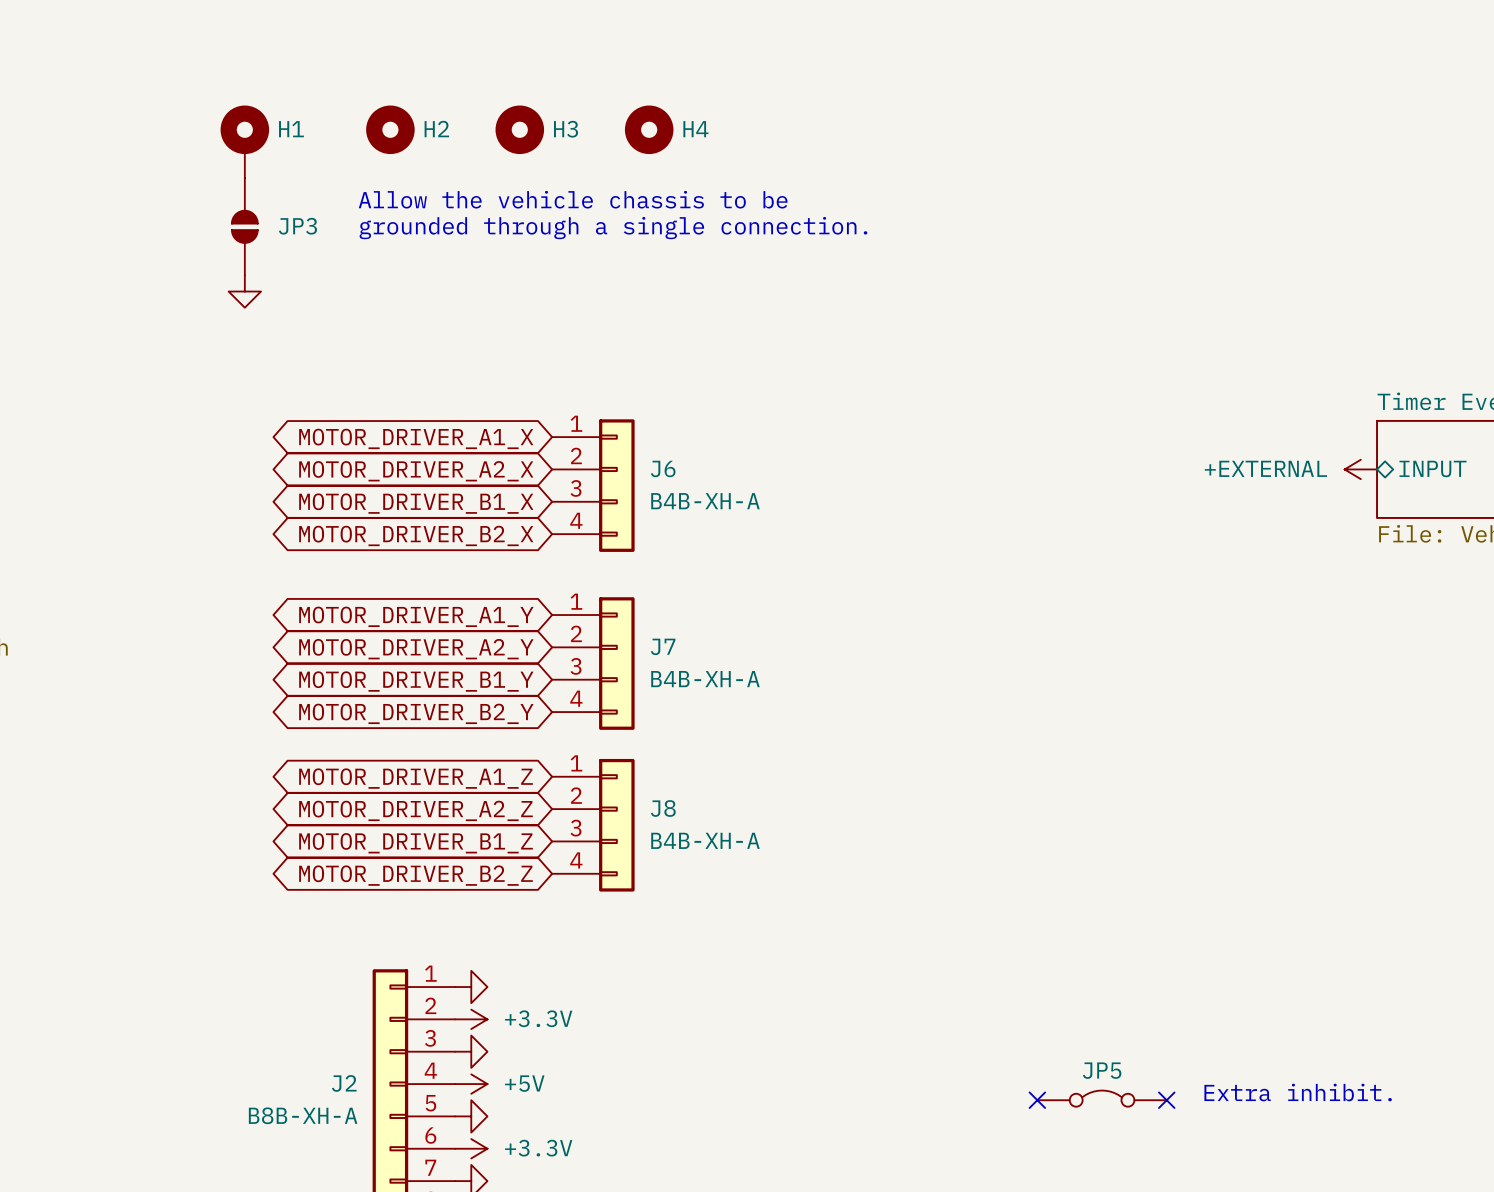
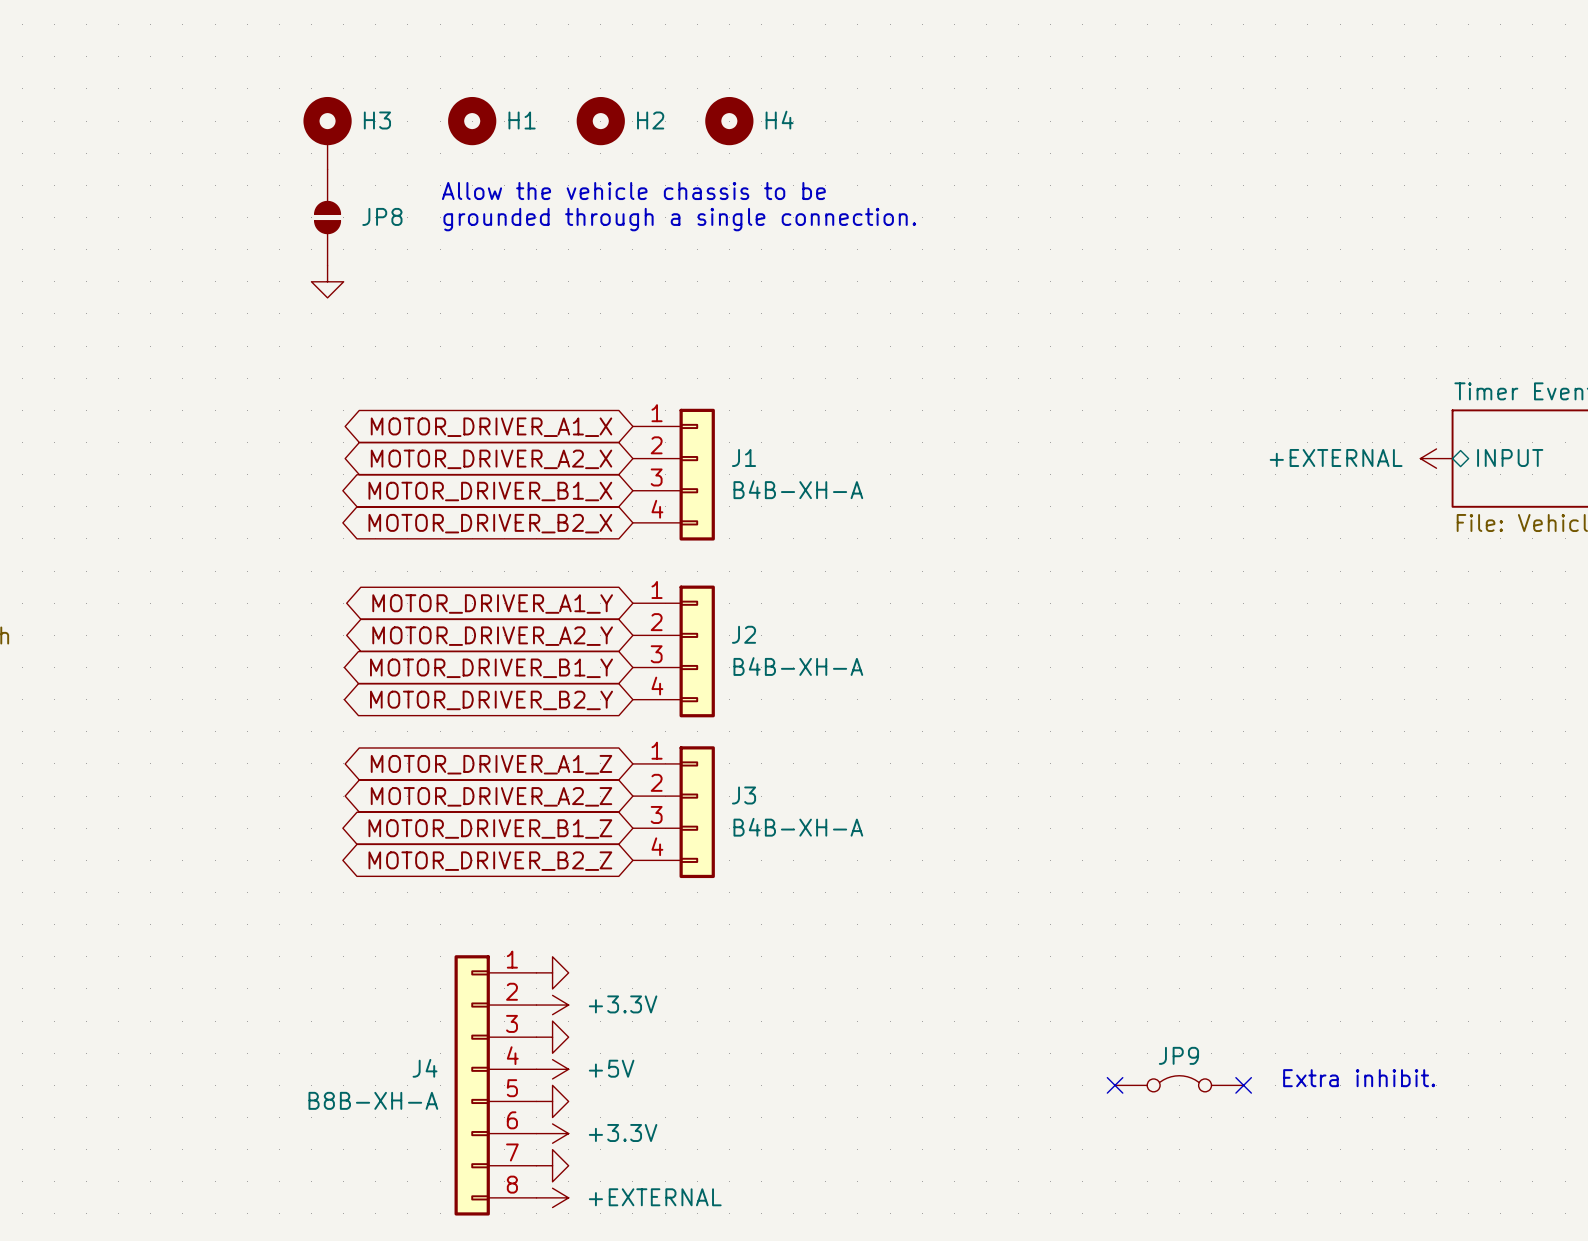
H1 name: H1 (291, 129) -> H3 (377, 120)
H2 name: H2 (436, 129) -> H1 (522, 120)
H3 name: H3 (566, 129) -> H2 (650, 120)
JP3 name: JP3 (297, 226) -> JP8 (382, 216)
J6 name: J6 (663, 468) -> J1 (744, 457)
J7 name: J7 (663, 646) -> J2 (744, 634)
J8 name: J8 (663, 808) -> J3 (744, 795)
JP5 name: JP5 (1102, 1070) -> JP9 (1178, 1055)
J2 name: J2 (344, 1083) -> J4 (425, 1068)

